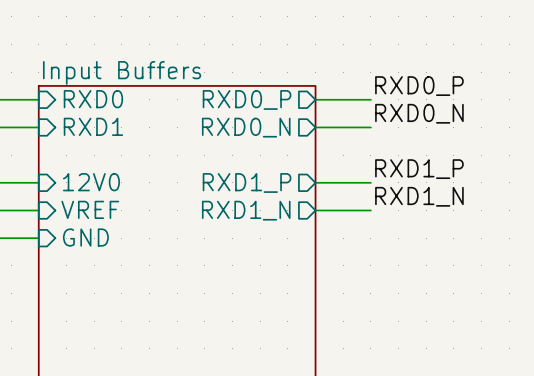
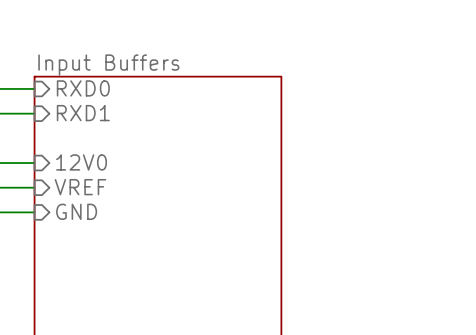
label: RXD0_P (419, 86) -> none
sheet pin: RXD0_P (247, 99) -> none
wire: (315, 99) (370, 99) -> none
label: RXD0_N (419, 113) -> none
sheet pin: RXD0_N (246, 127) -> none
wire: (315, 127) (370, 127) -> none
label: RXD1_P (419, 169) -> none
sheet pin: RXD1_P (247, 182) -> none
wire: (315, 182) (370, 182) -> none
label: RXD1_N (419, 196) -> none
sheet pin: RXD1_N (246, 210) -> none
wire: (315, 210) (370, 210) -> none

